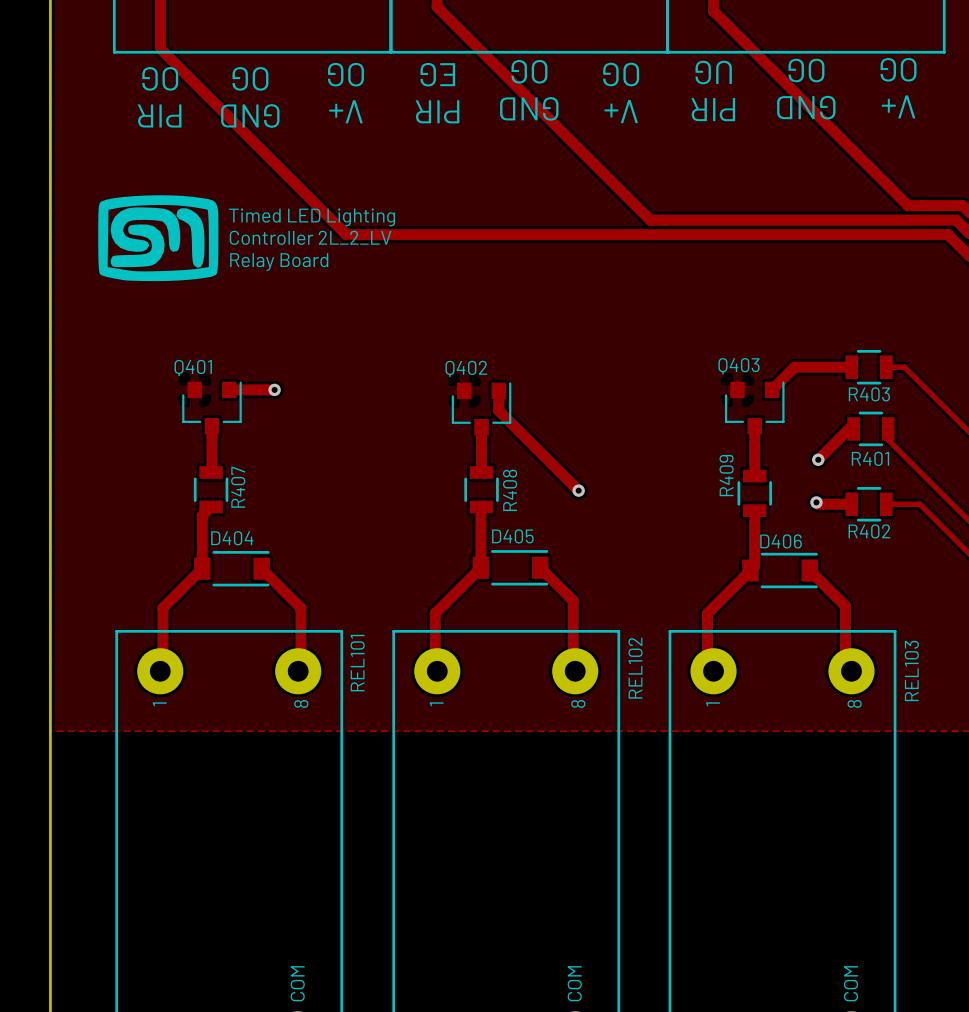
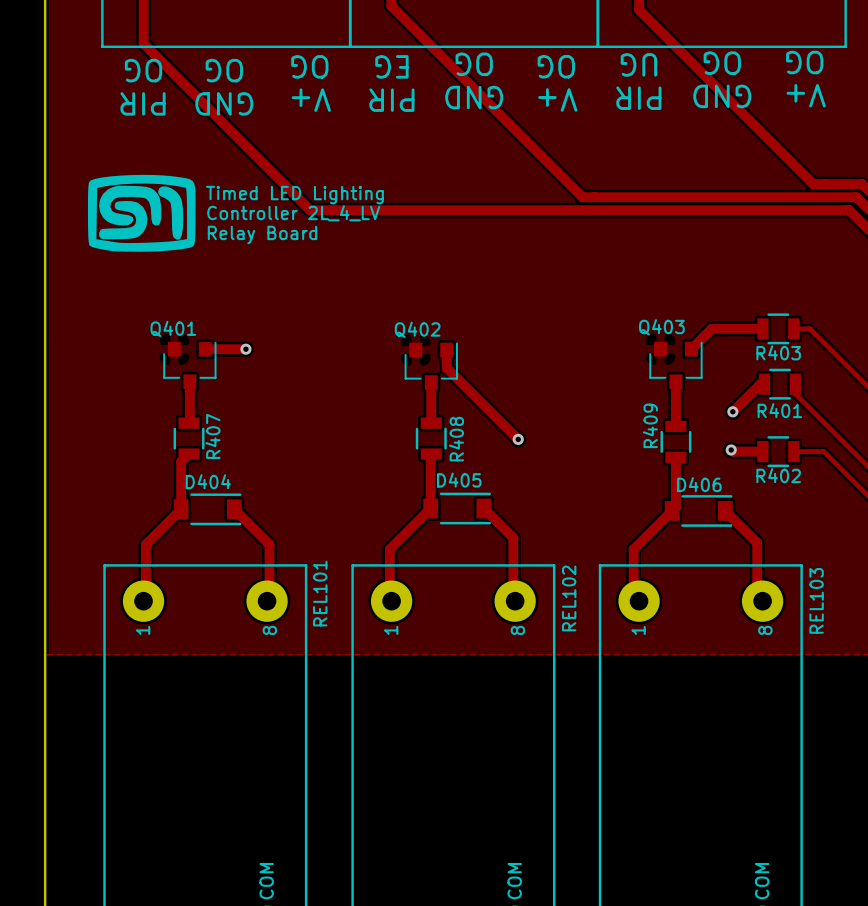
text: Controller 2L_2_LV (310, 237) -> Controller 2L_4_LV (293, 213)

